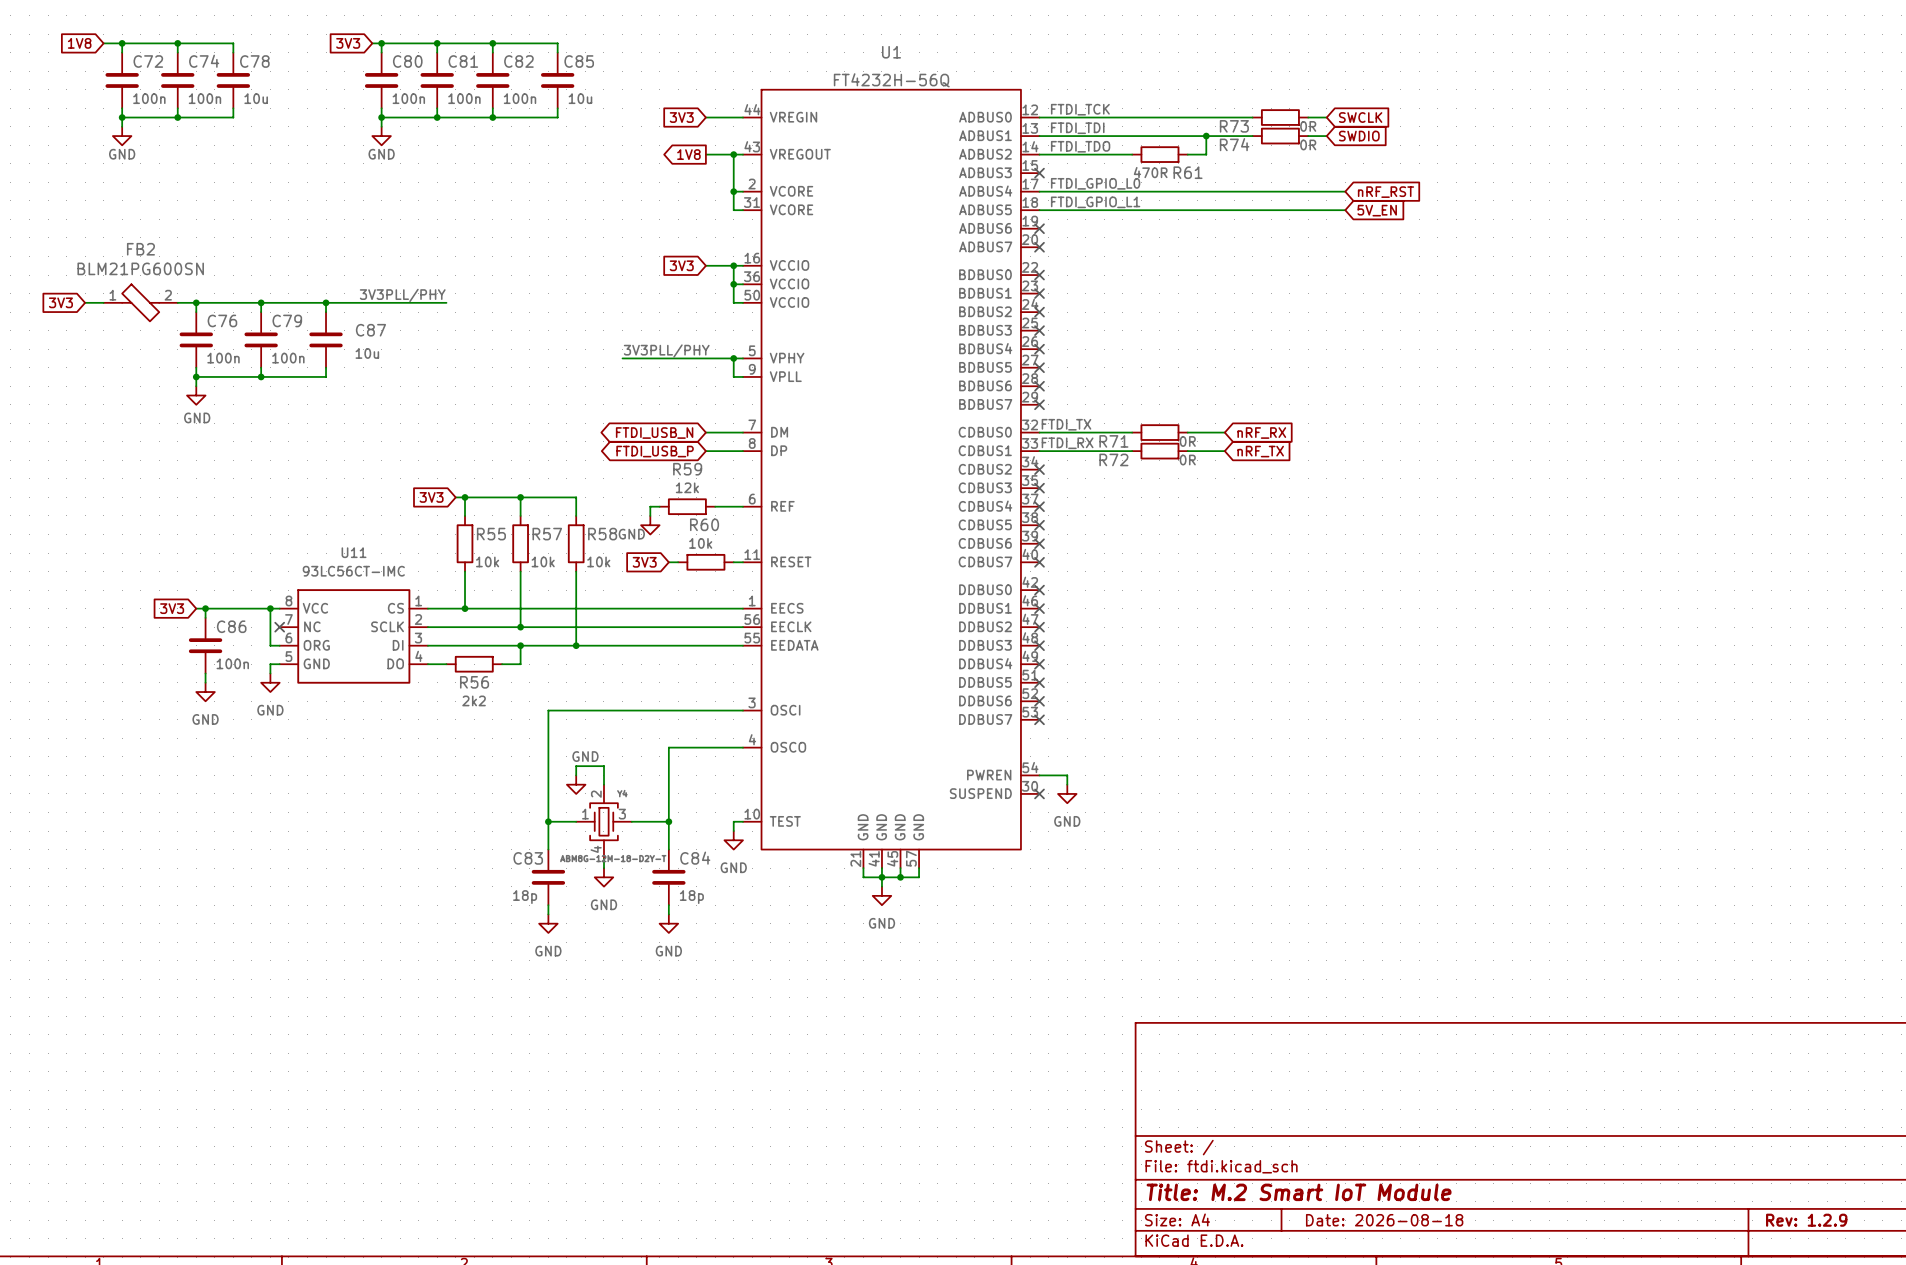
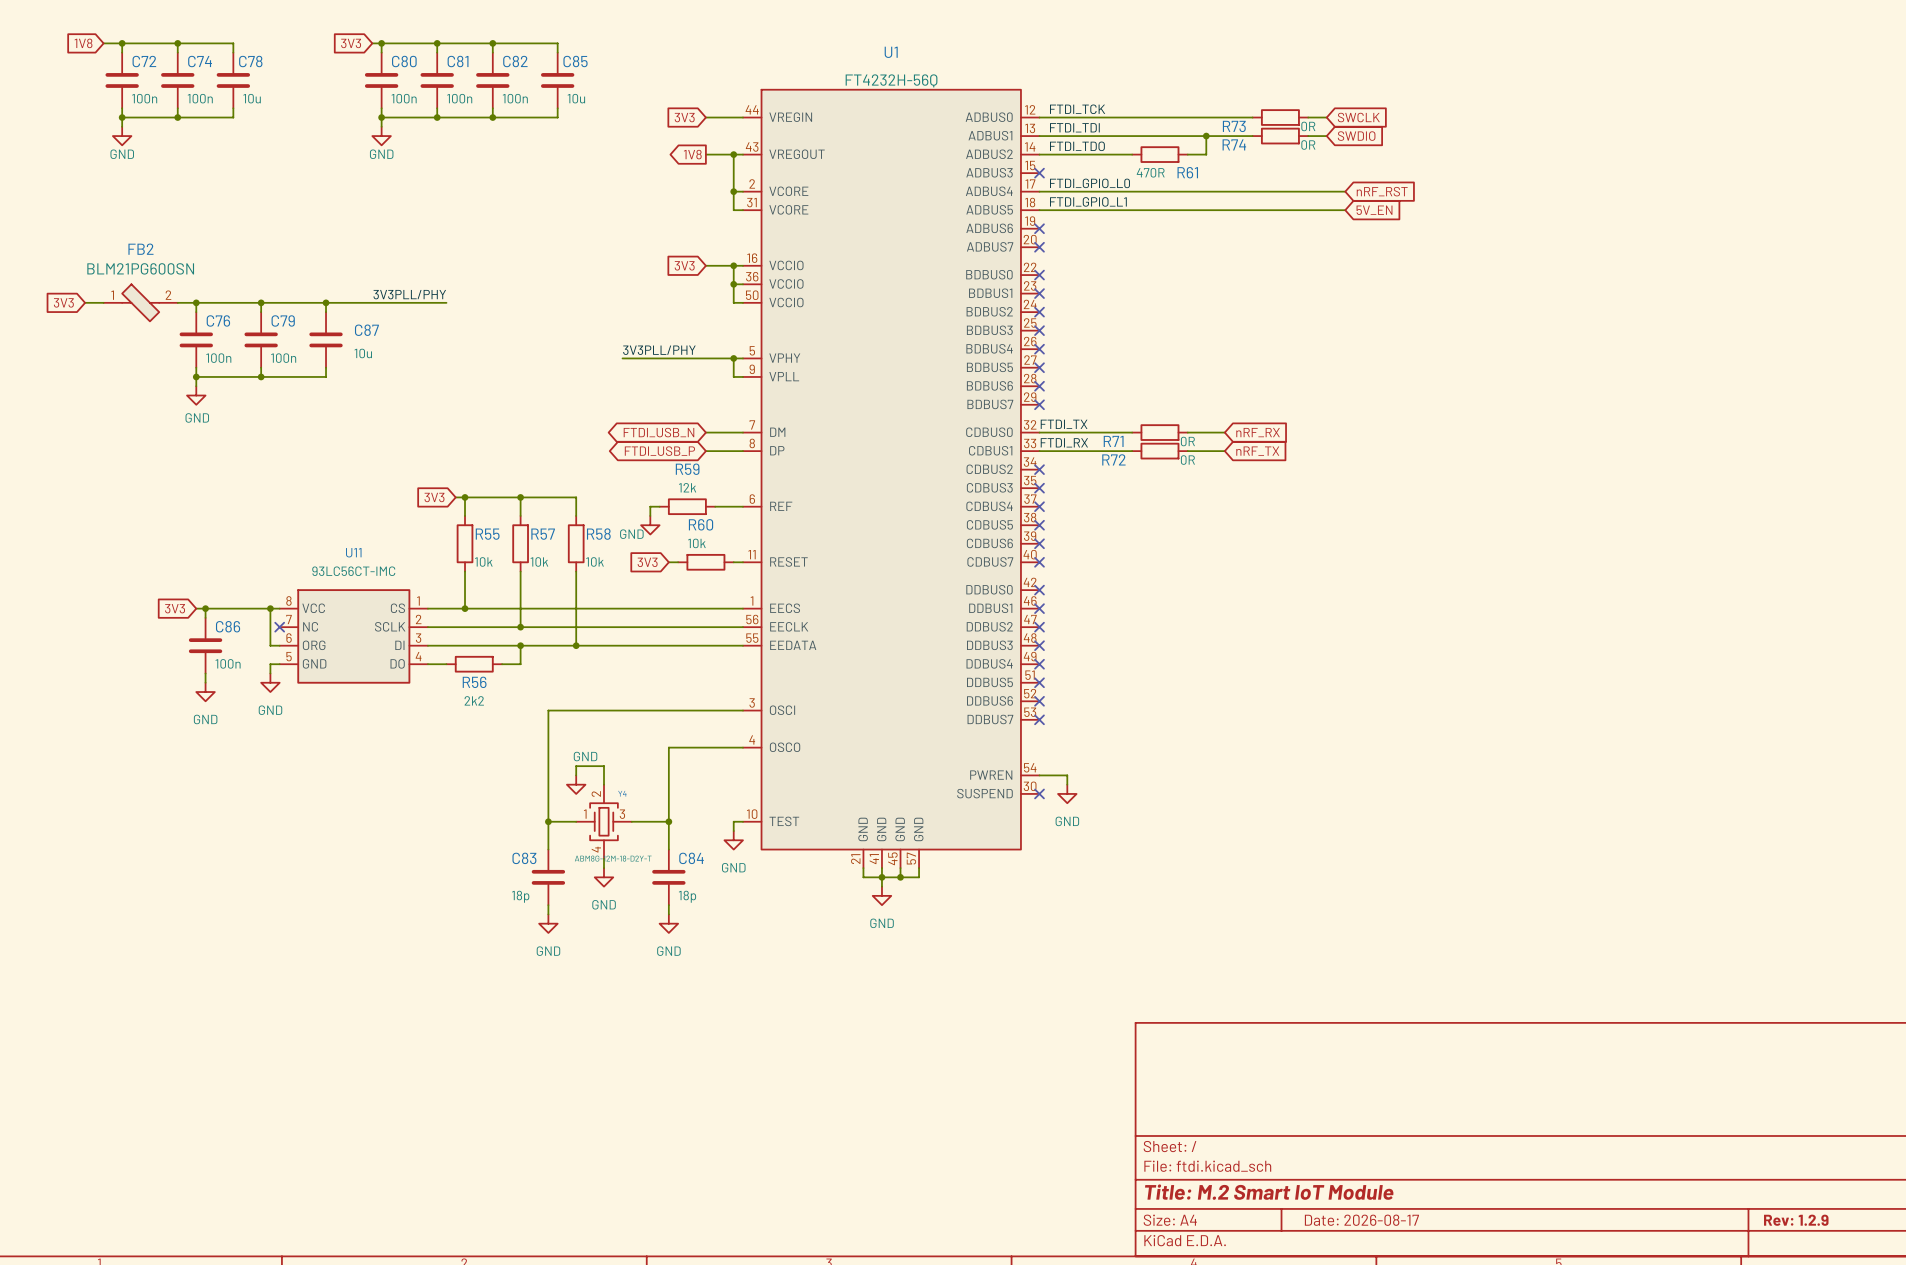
title block: Date: 2026-08-18 (1384, 1220) -> Date: 2026-08-17 (1361, 1220)

